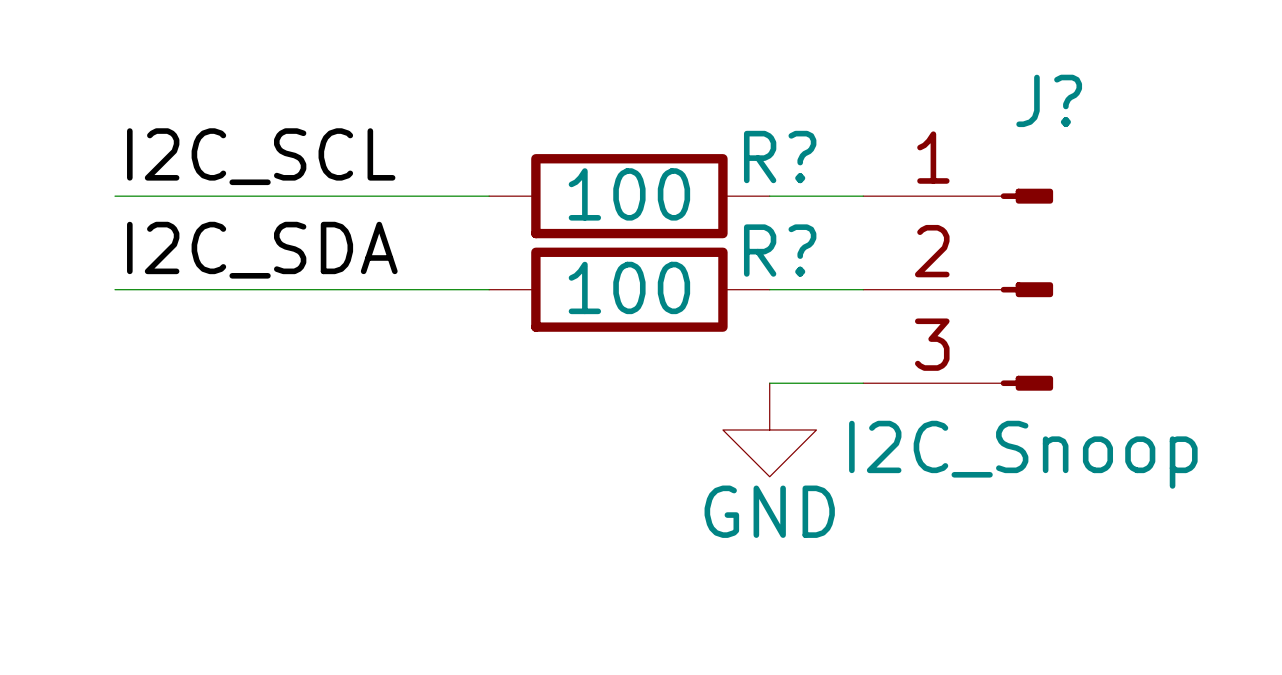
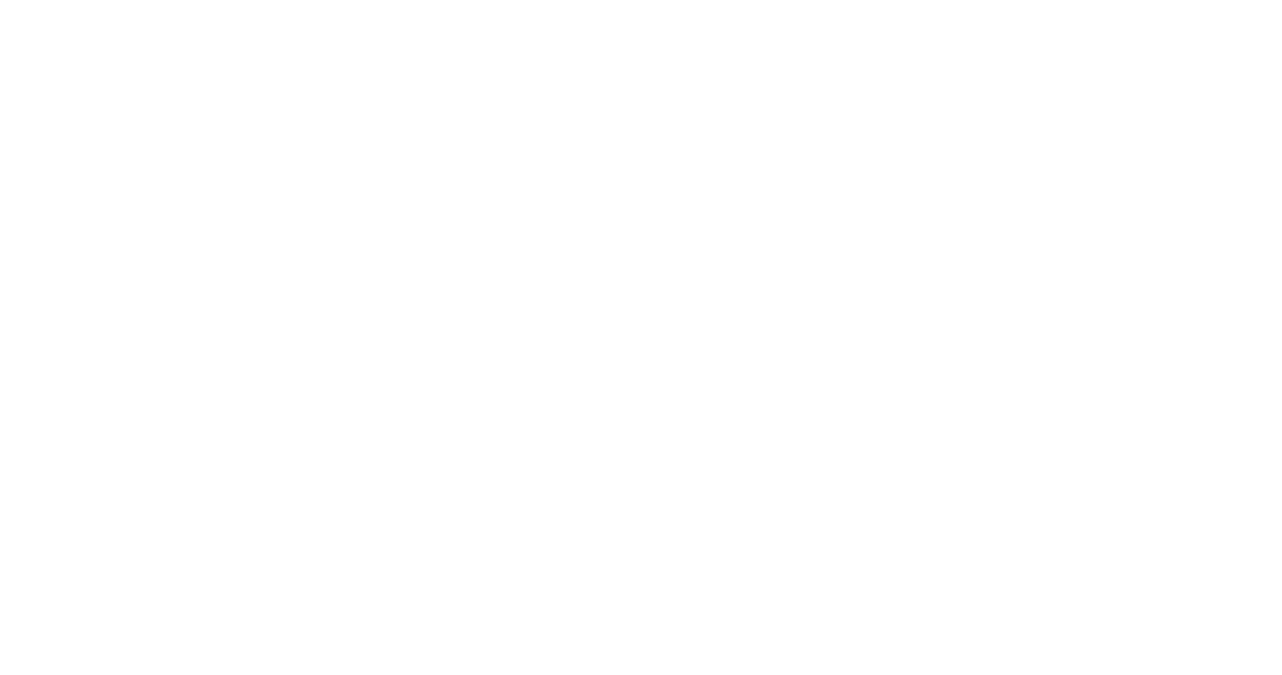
label: I2C_SCL (261, 156) -> none
wire: (115, 196) (489, 196) -> none
R?: 100 (629, 196) -> none
wire: (769, 196) (863, 196) -> none
label: I2C_SDA (262, 250) -> none
wire: (115, 289) (489, 289) -> none
R?: 100 (629, 289) -> none
wire: (769, 289) (863, 289) -> none
J?: I2C_Snoop (958, 289) -> none
wire: (769, 383) (863, 383) -> none
power symbol: GND (769, 429) -> none

